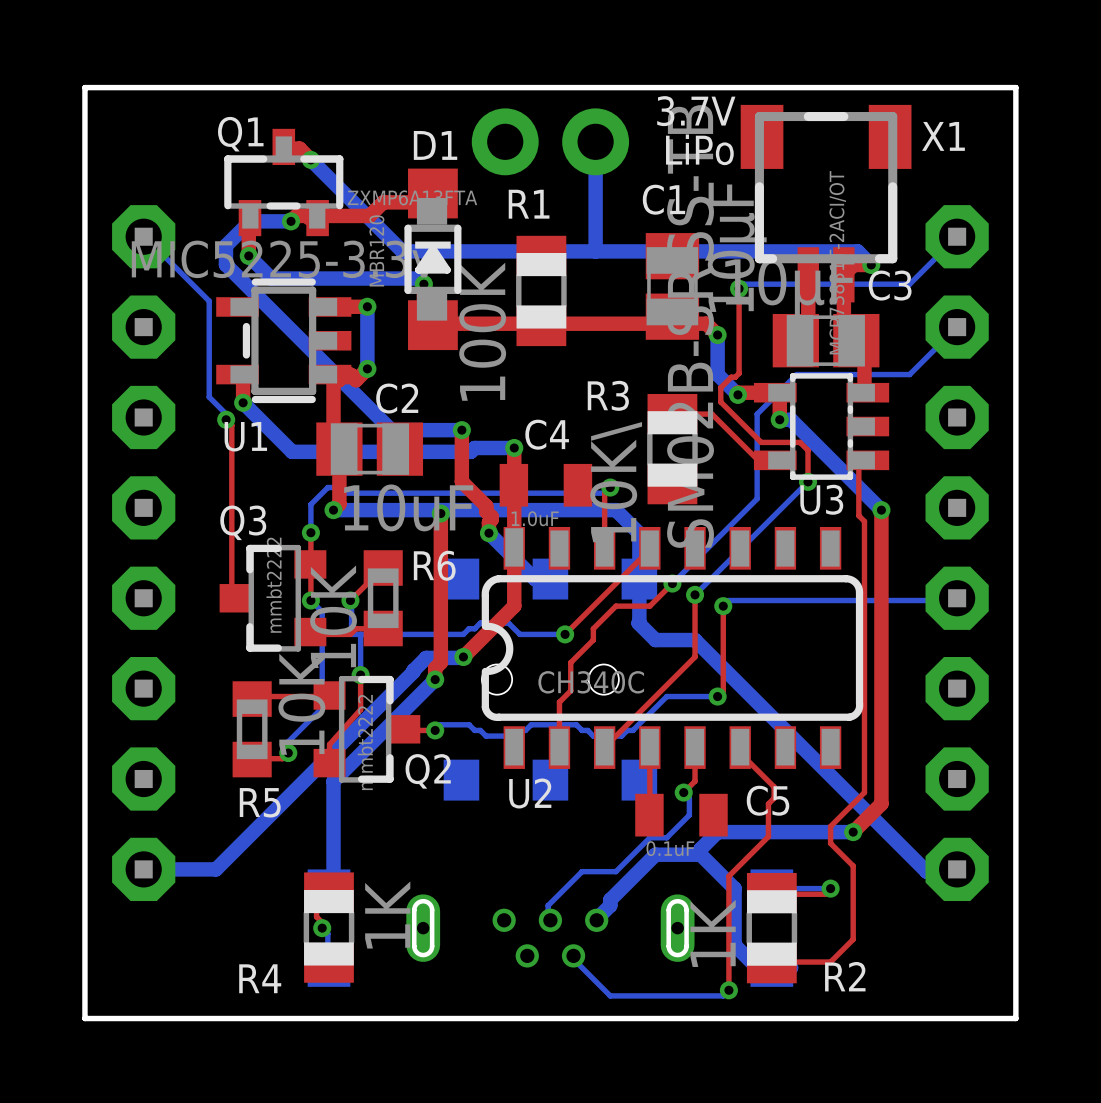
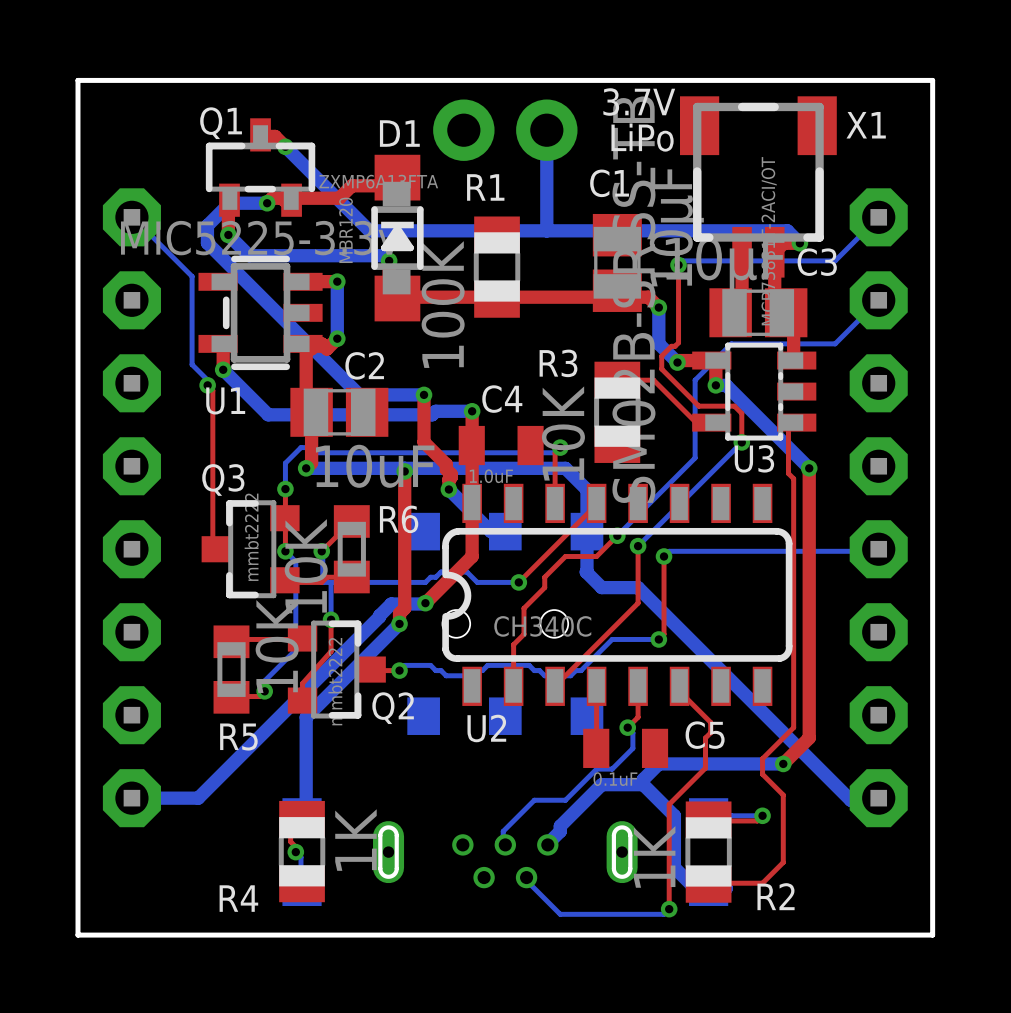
R3 value: 10K\ (616, 482) -> 10K (563, 433)

